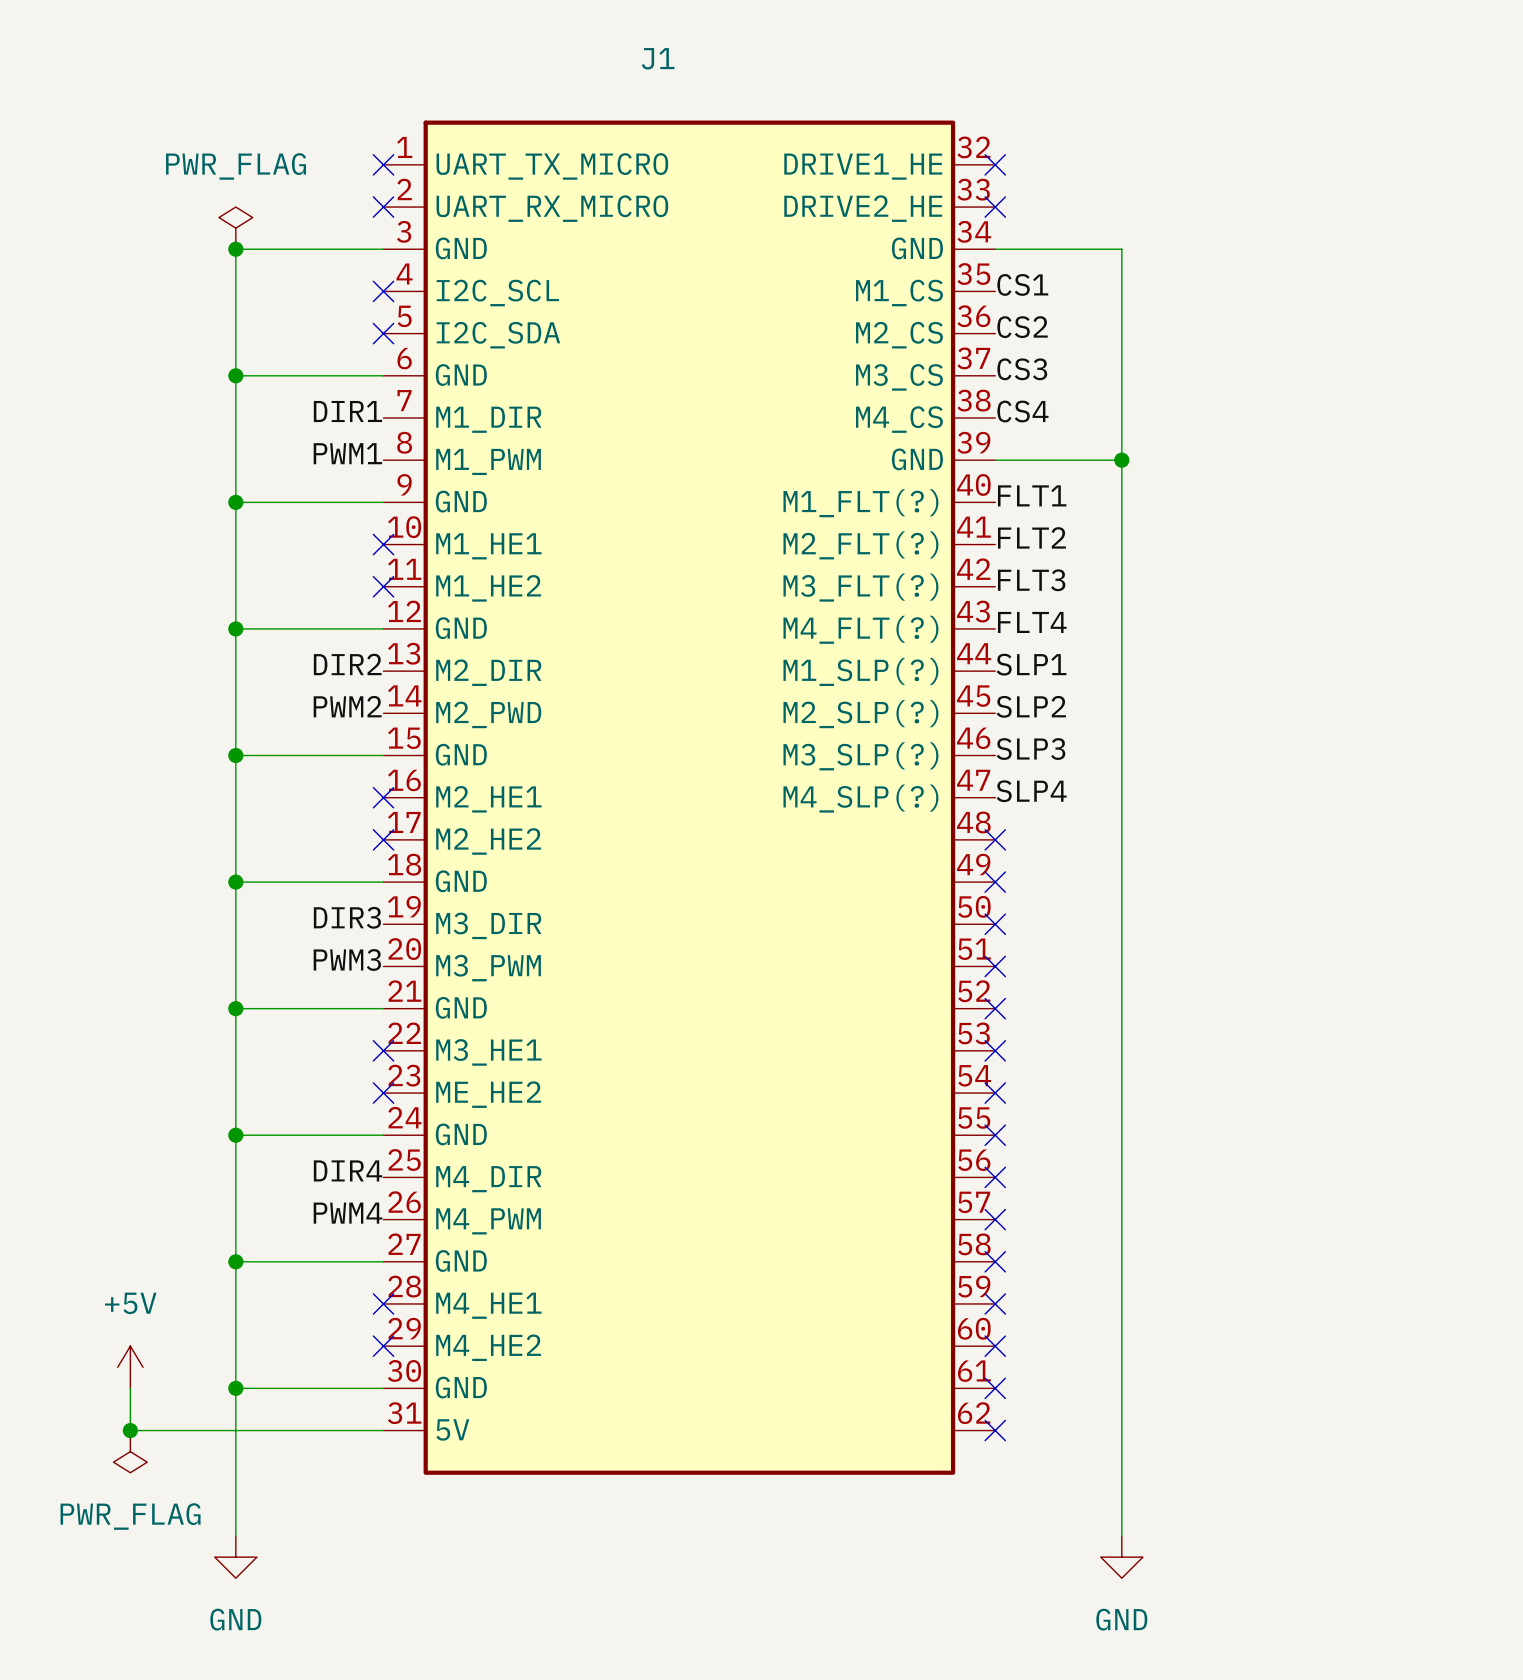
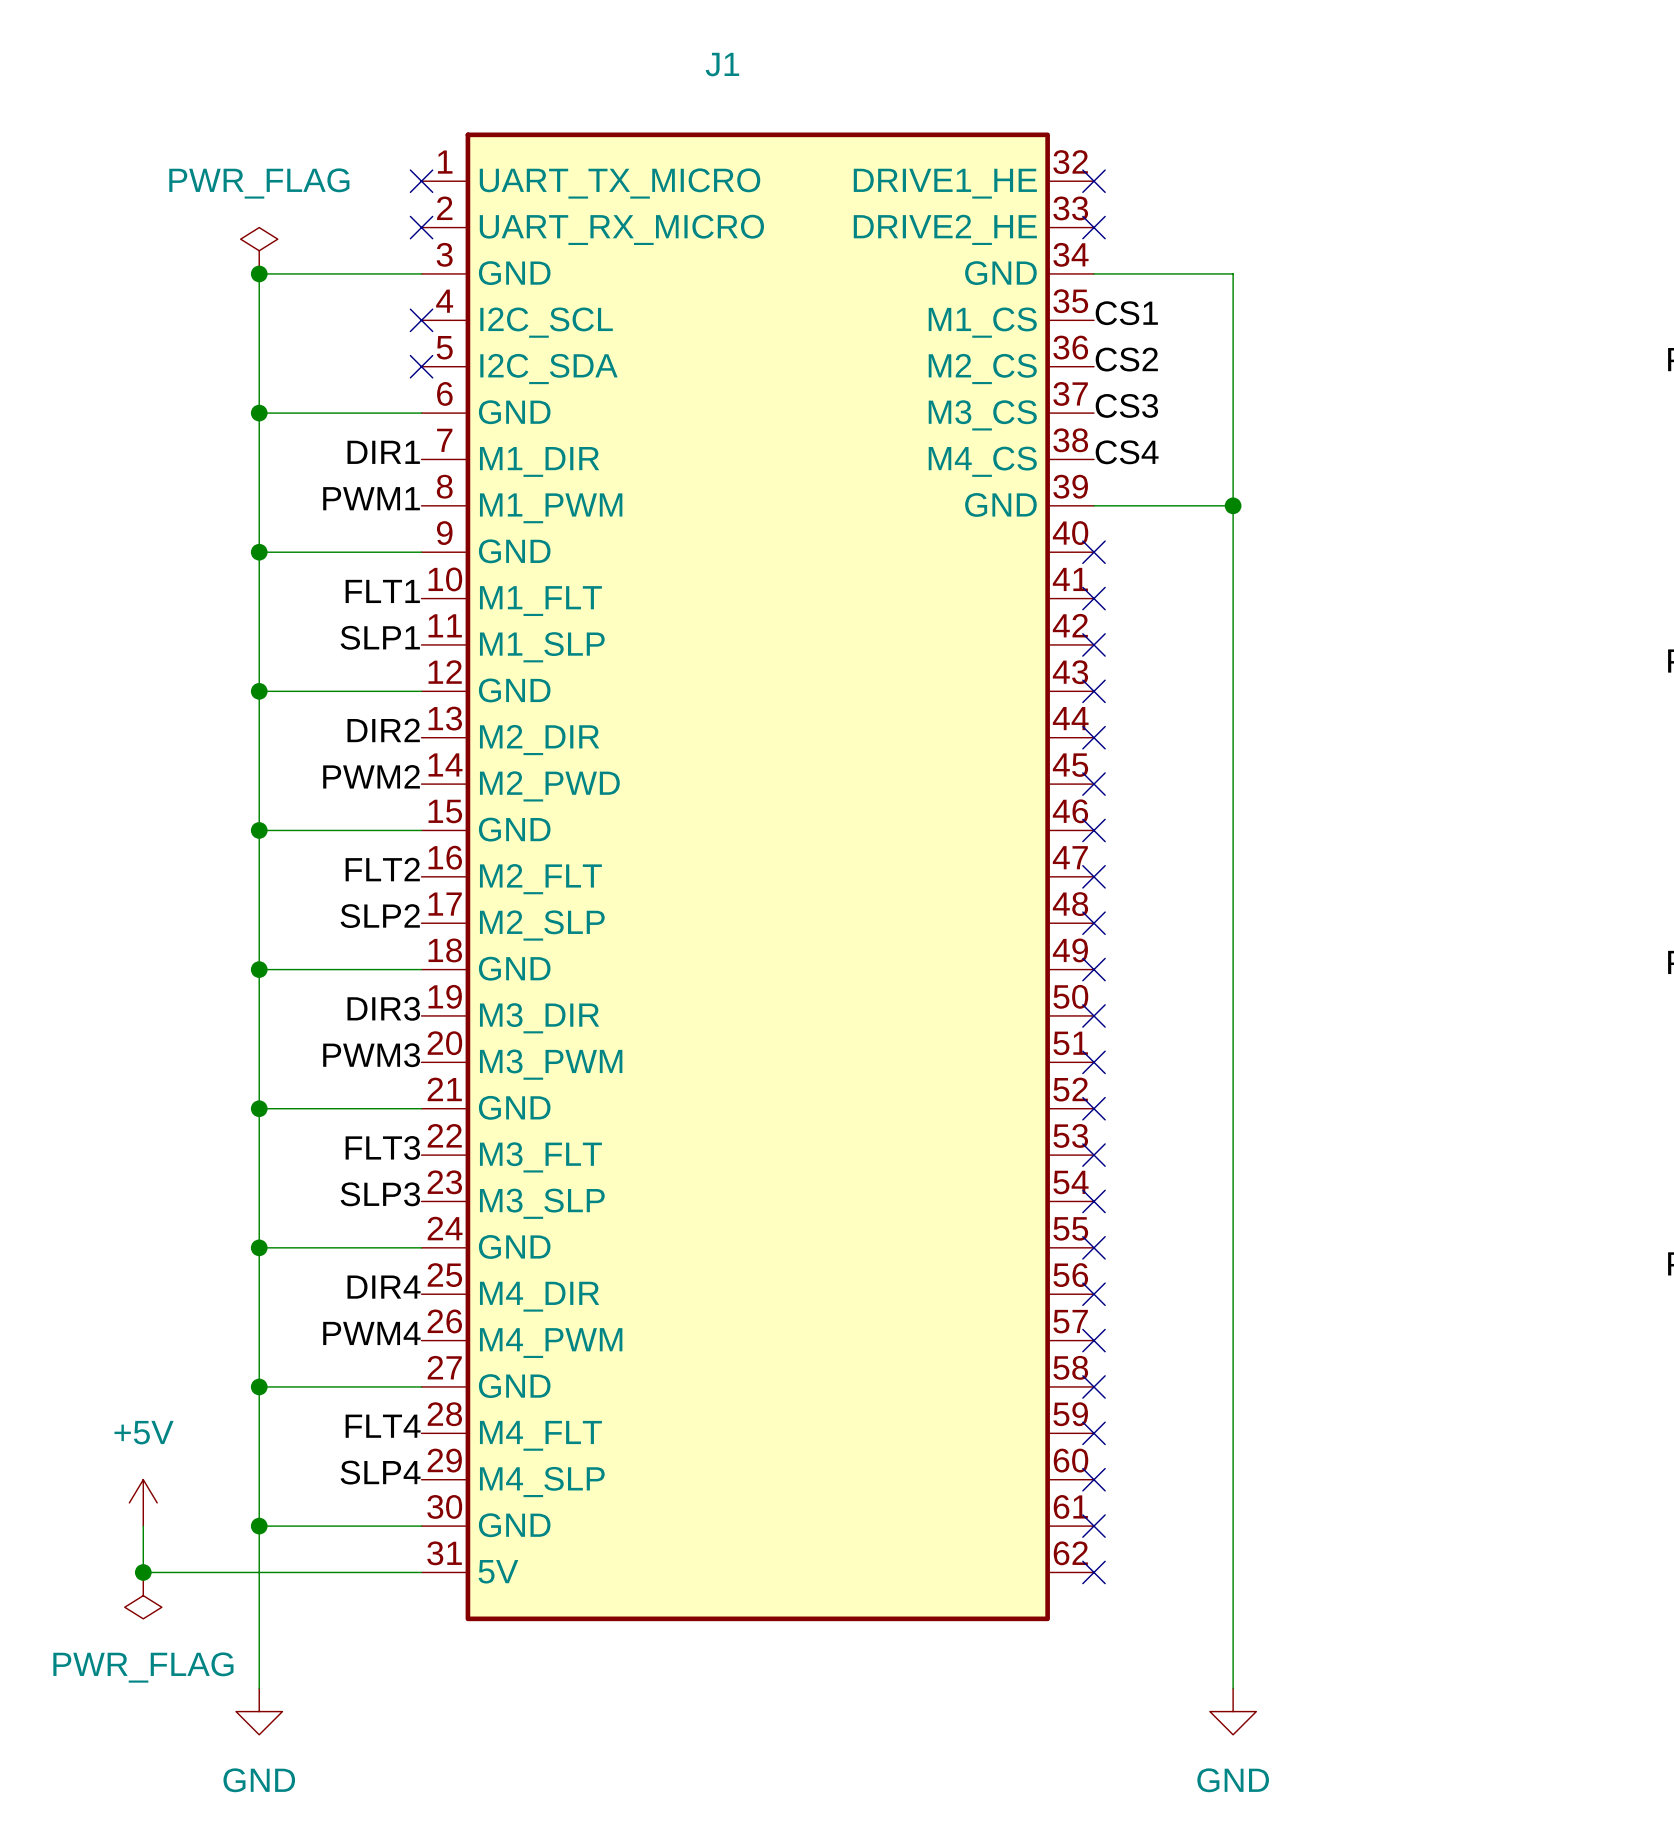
J1 symbol: [383, 120, 996, 1475] -> [421, 132, 1094, 1622]
label: FLT1 (1032, 495) -> none
no-connect mark: none -> (1093, 552)
label: FLT2 (1031, 537) -> none
label: none -> FLT1 (382, 591)
no-connect mark: (383, 544) -> none
no-connect mark: none -> (1093, 598)
label: none -> SLP1 (380, 637)
label: FLT3 (1031, 580) -> none
no-connect mark: (383, 586) -> none
no-connect mark: none -> (1093, 644)
label: FLT4 (1032, 622) -> none
no-connect mark: none -> (1093, 691)
label: SLP1 (1031, 664) -> none
no-connect mark: none -> (1093, 737)
label: SLP2 (1031, 706) -> none
no-connect mark: none -> (1093, 784)
label: SLP3 (1030, 749) -> none
no-connect mark: none -> (1093, 830)
label: none -> FLT2 (382, 869)
label: SLP4 (1031, 791) -> none
no-connect mark: (383, 797) -> none
no-connect mark: none -> (1093, 876)
label: none -> SLP2 (380, 916)
no-connect mark: (383, 839) -> none
label: none -> FLT3 (382, 1147)
no-connect mark: (383, 1050) -> none
label: none -> SLP3 (380, 1194)
no-connect mark: (383, 1093) -> none
label: none -> FLT4 (383, 1426)
no-connect mark: (383, 1303) -> none
label: none -> SLP4 (380, 1472)
no-connect mark: (383, 1346) -> none

